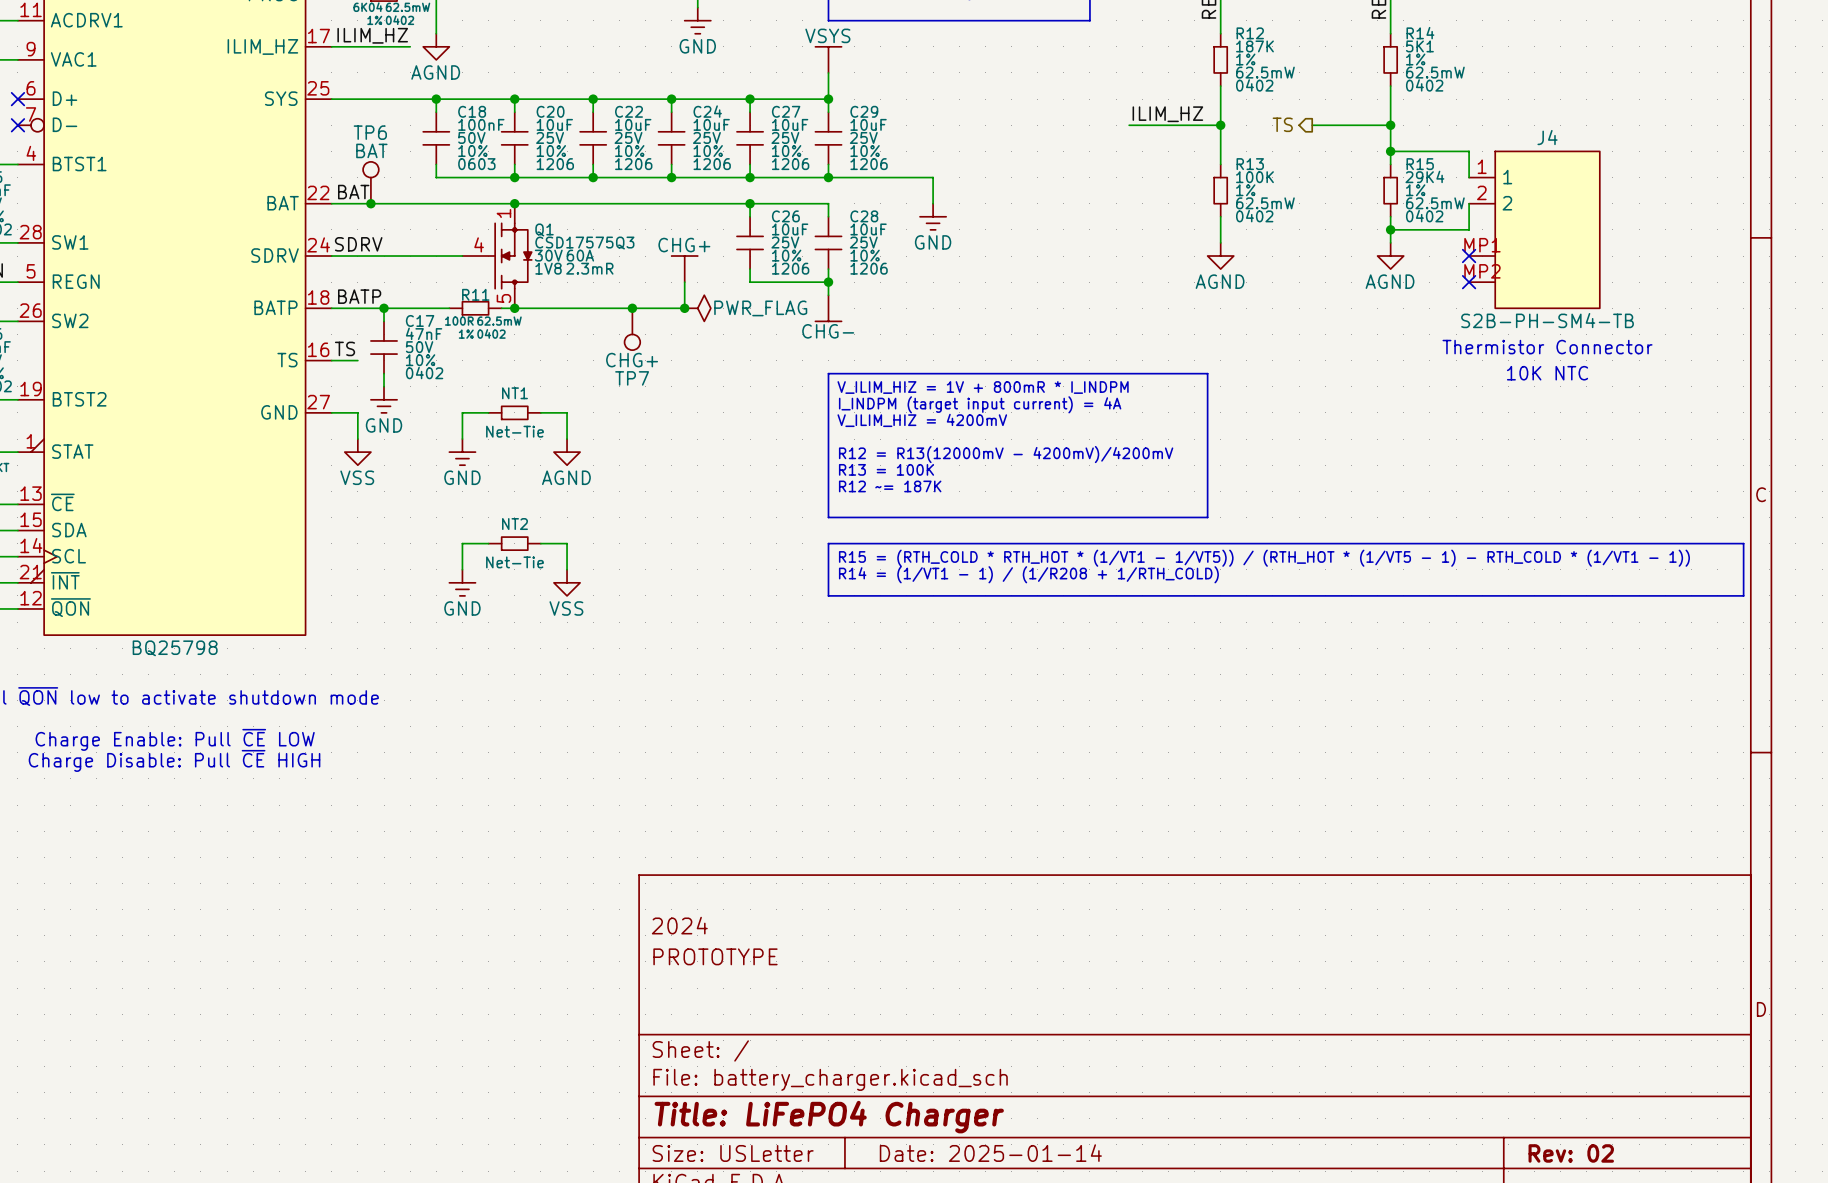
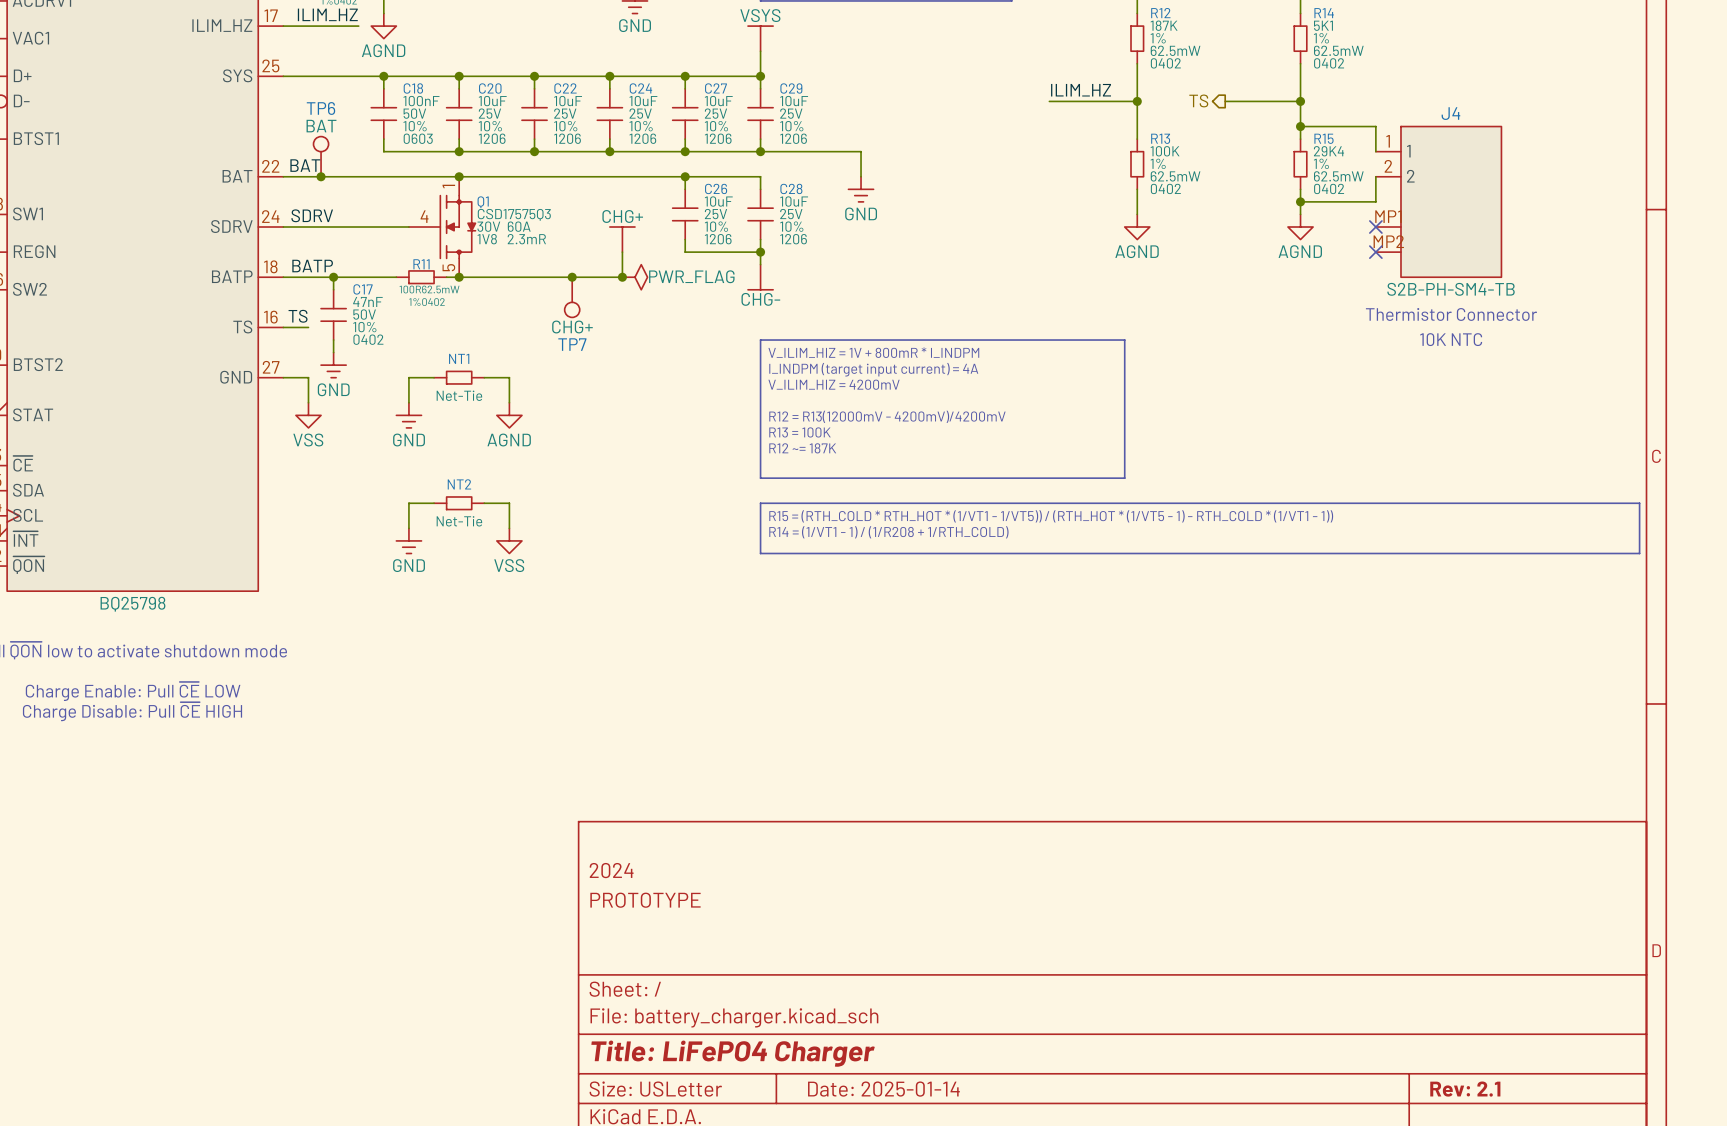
title block: Rev: 02 (1571, 1153) -> Rev: 2.1 (1465, 1089)

